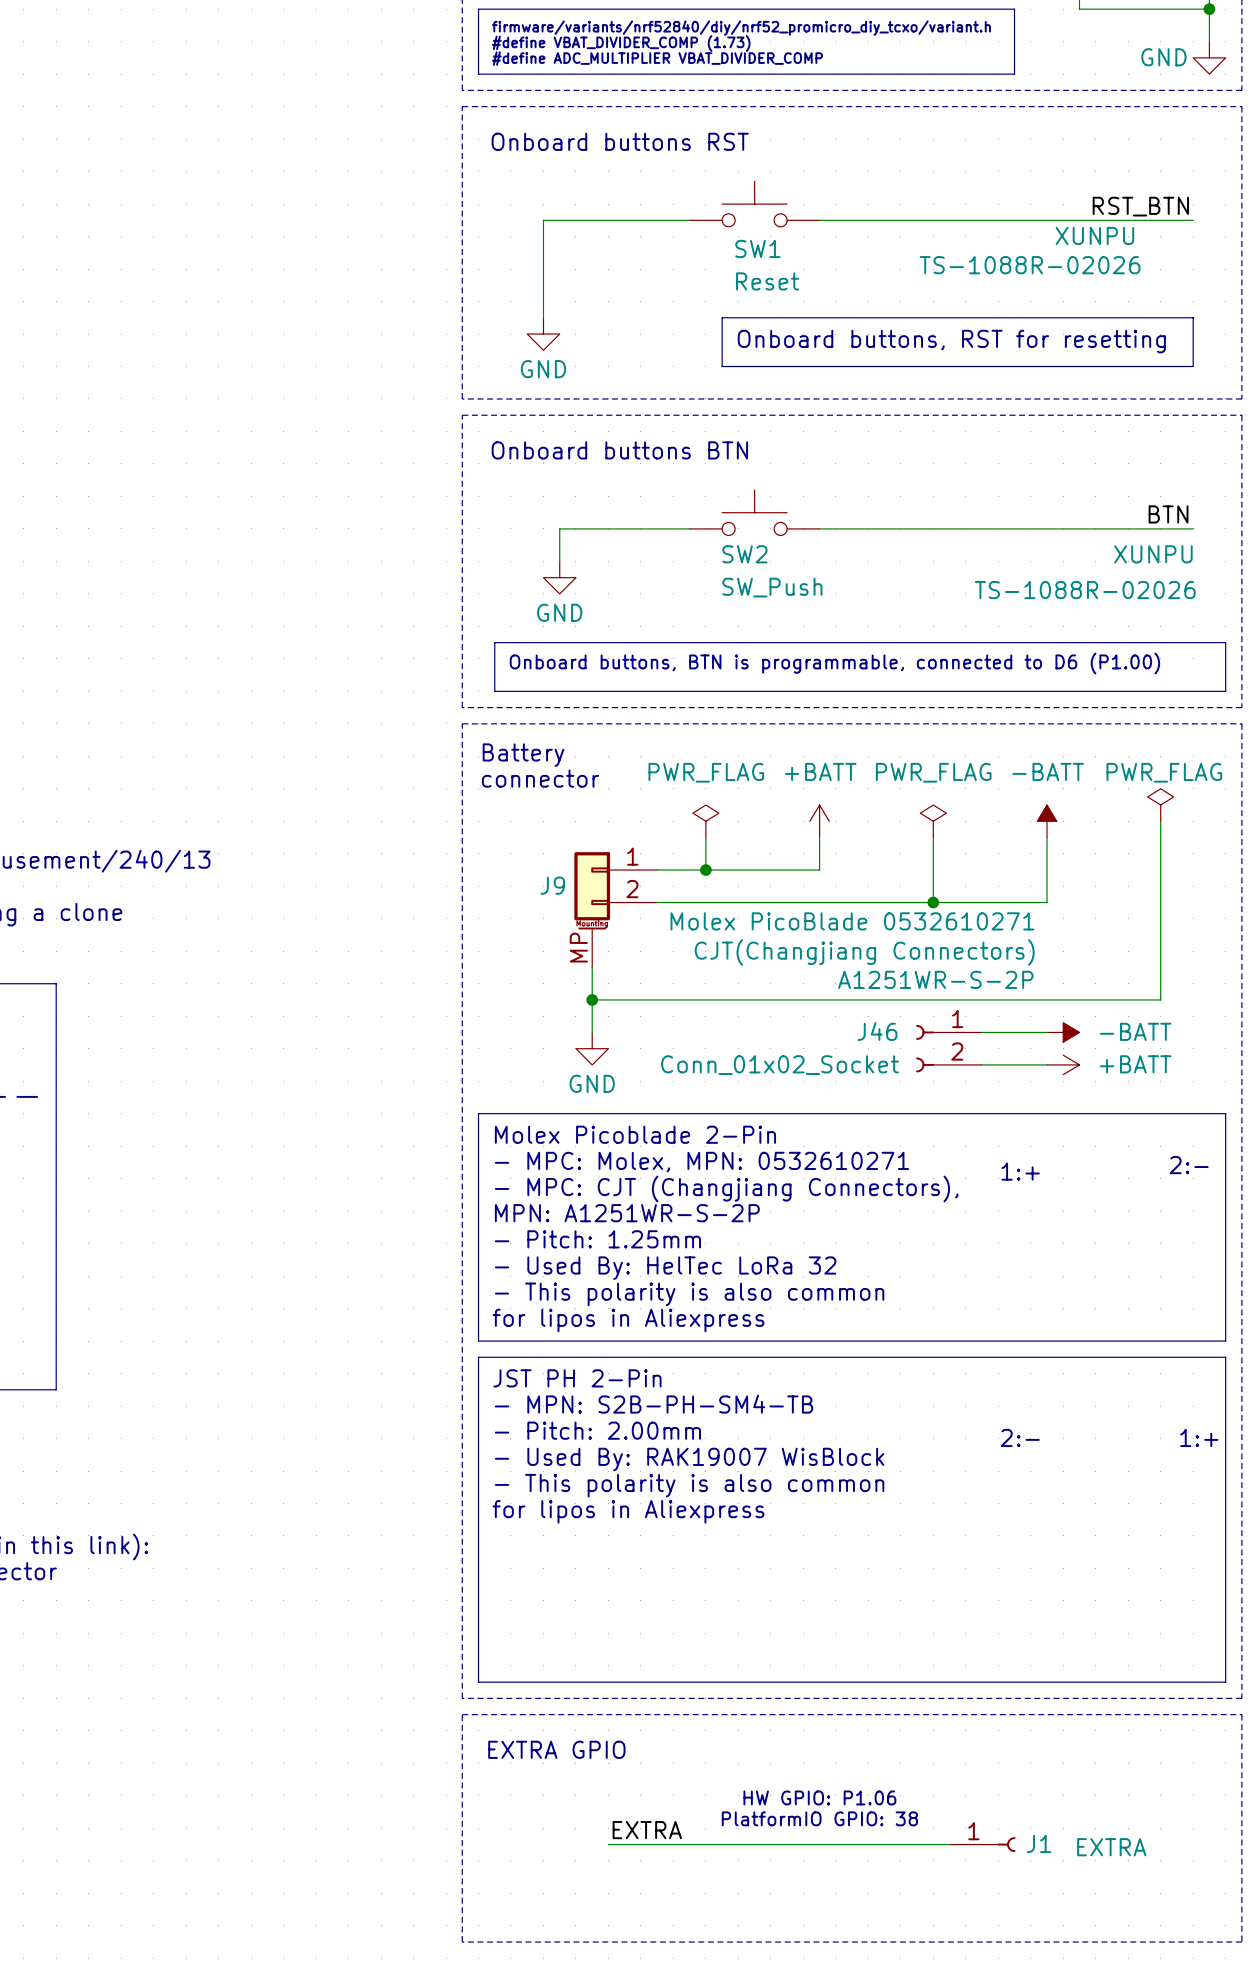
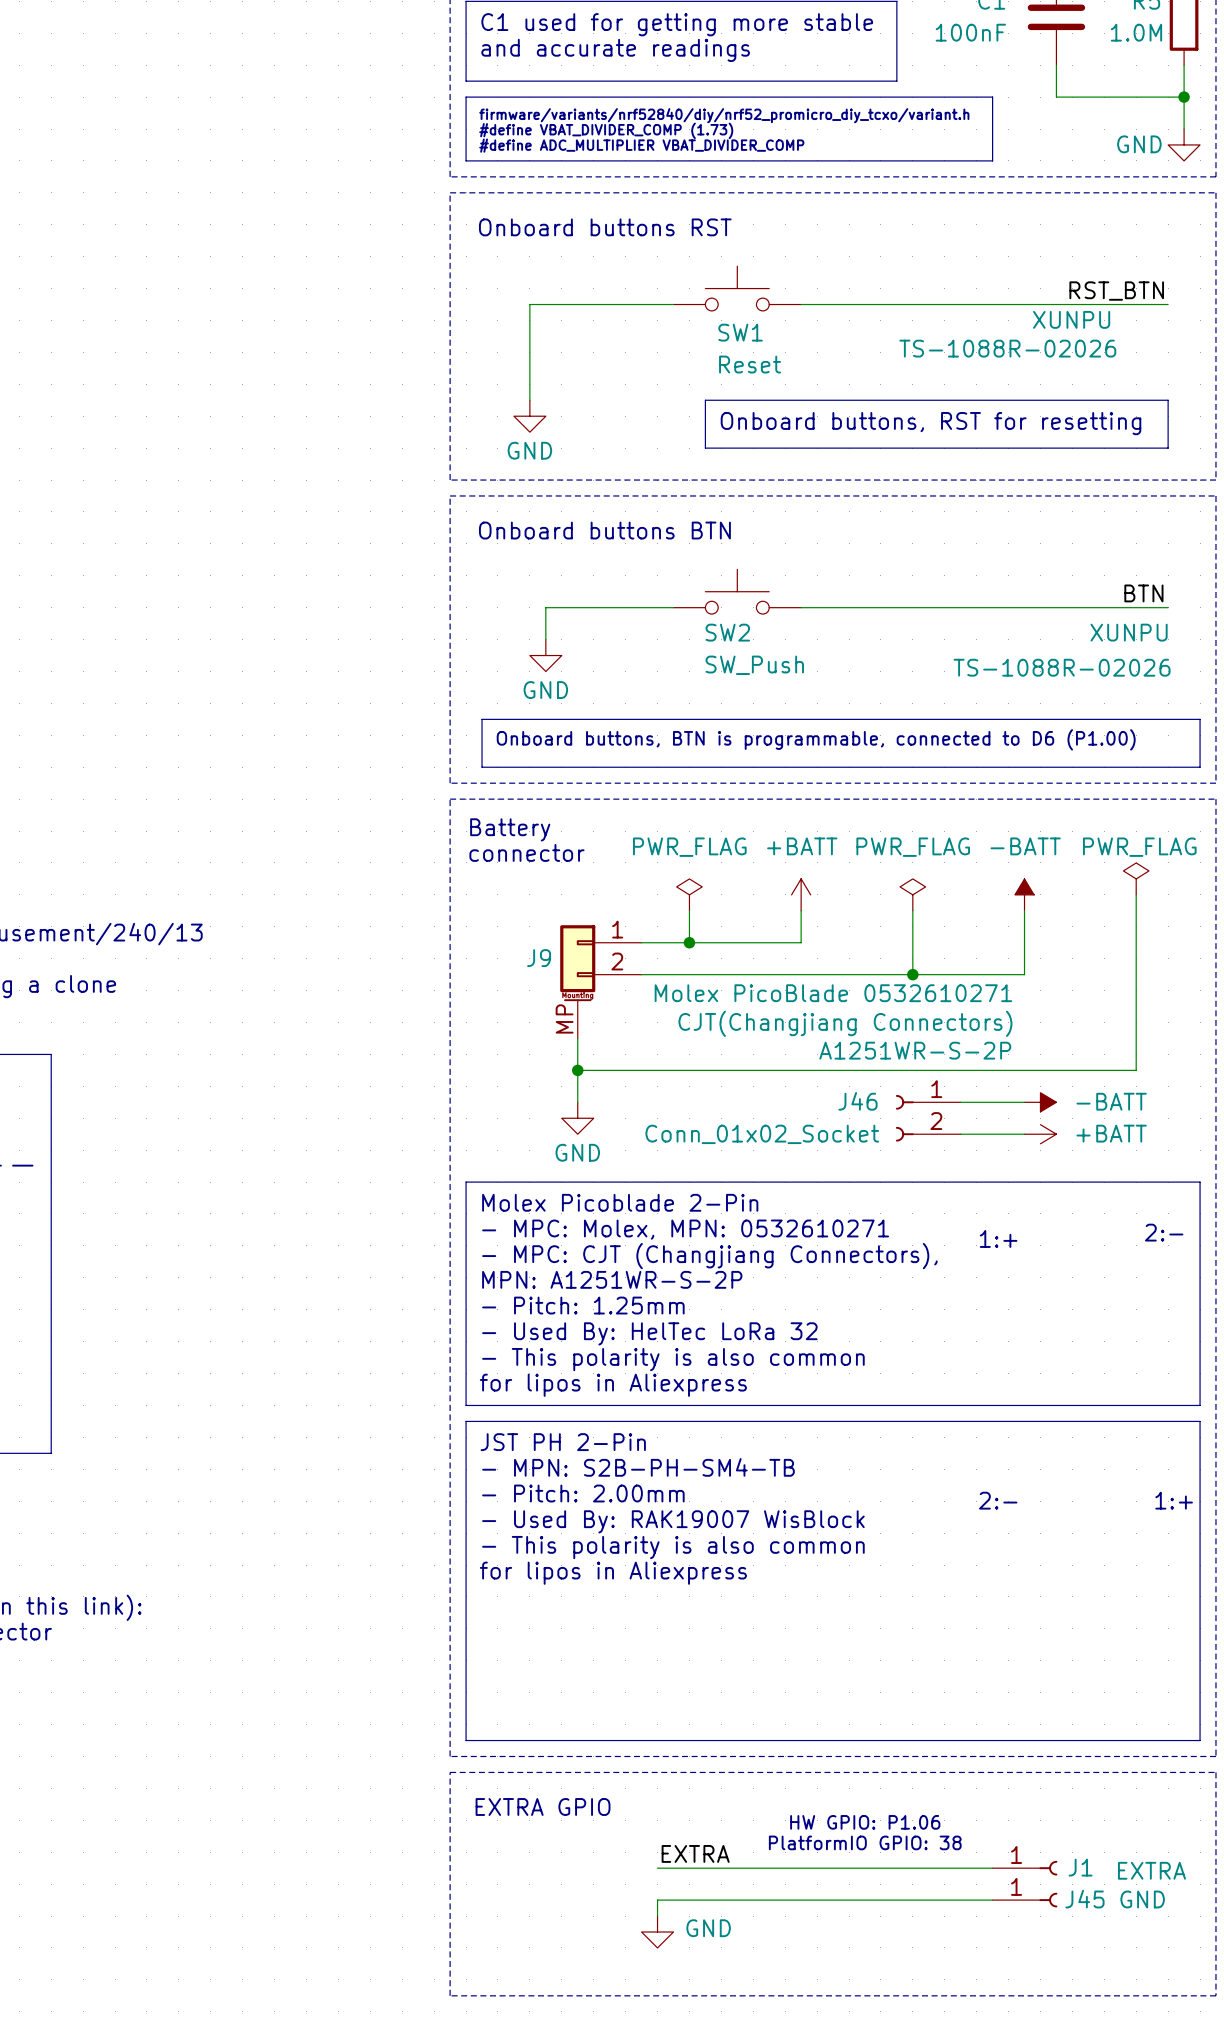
text position: HW GPIO: P1.06 (819, 1797) -> HW GPIO: P1.06 (865, 1822)
wire: none -> (657, 1868) (992, 1868)
text position: PlatformIO GPIO: 38 (819, 1818) -> PlatformIO GPIO: 38 (865, 1842)
label position: EXTRA (647, 1830) -> EXTRA (695, 1853)
wire: (608, 1844) (673, 1844) -> (657, 1916) (657, 1900)
J1 position: (982, 1844) -> (1024, 1868)
J45: none -> GND (1024, 1900)
power symbol: none -> GND (657, 1932)

